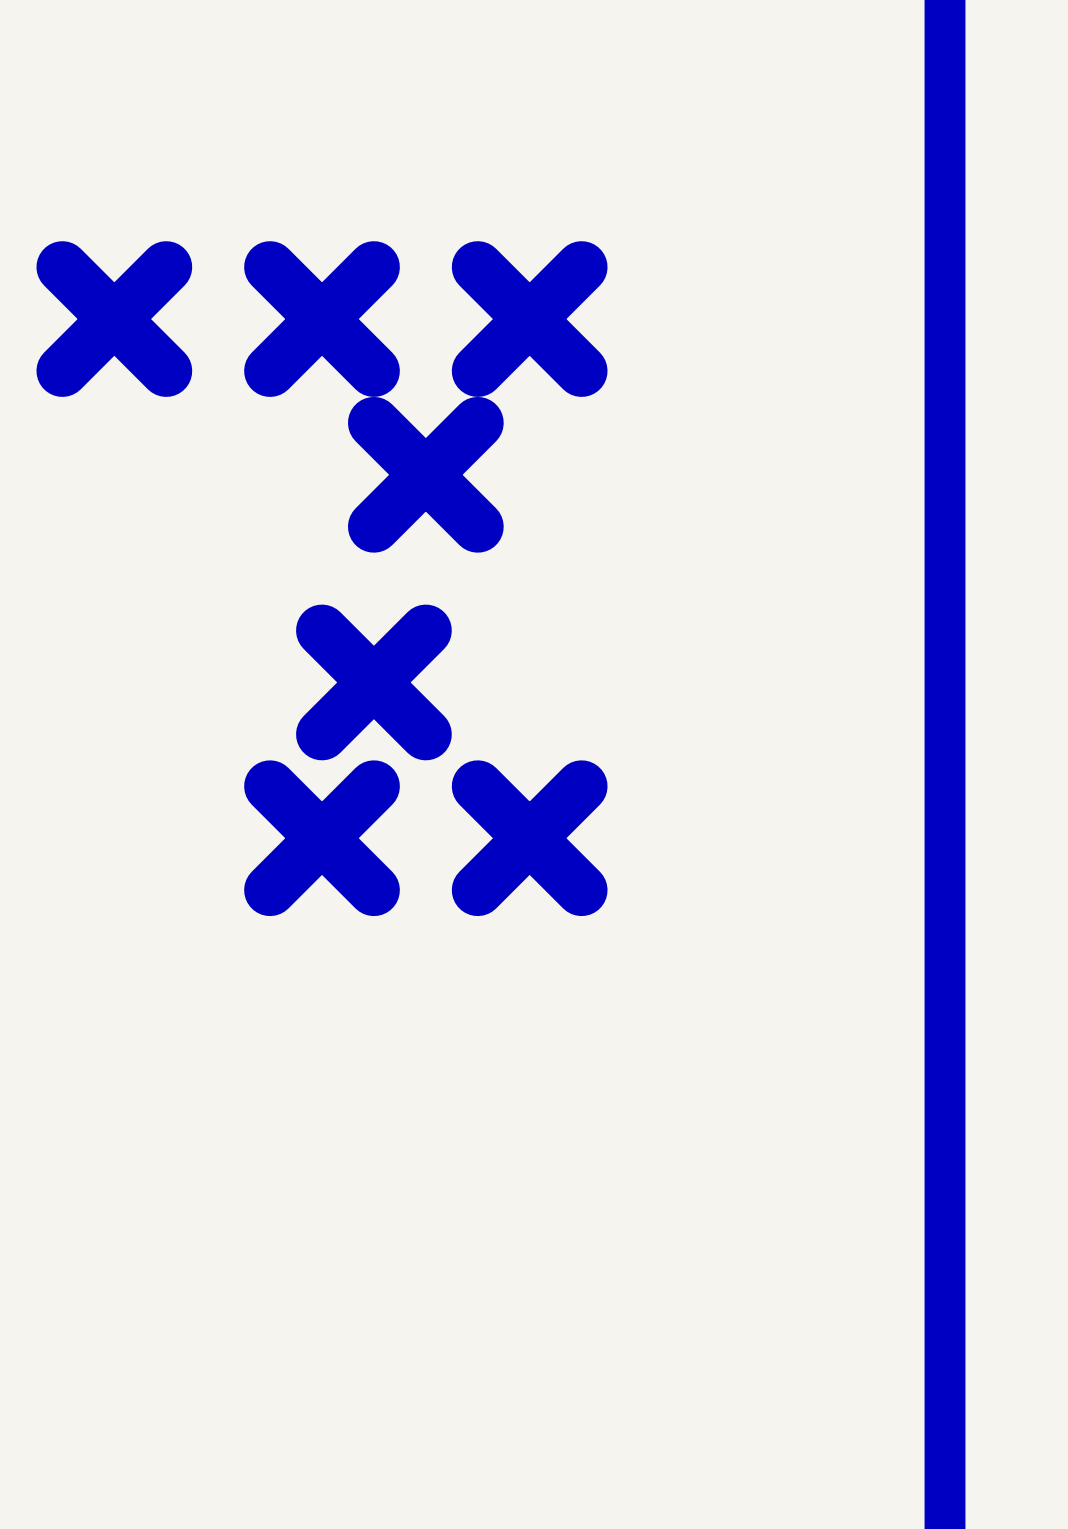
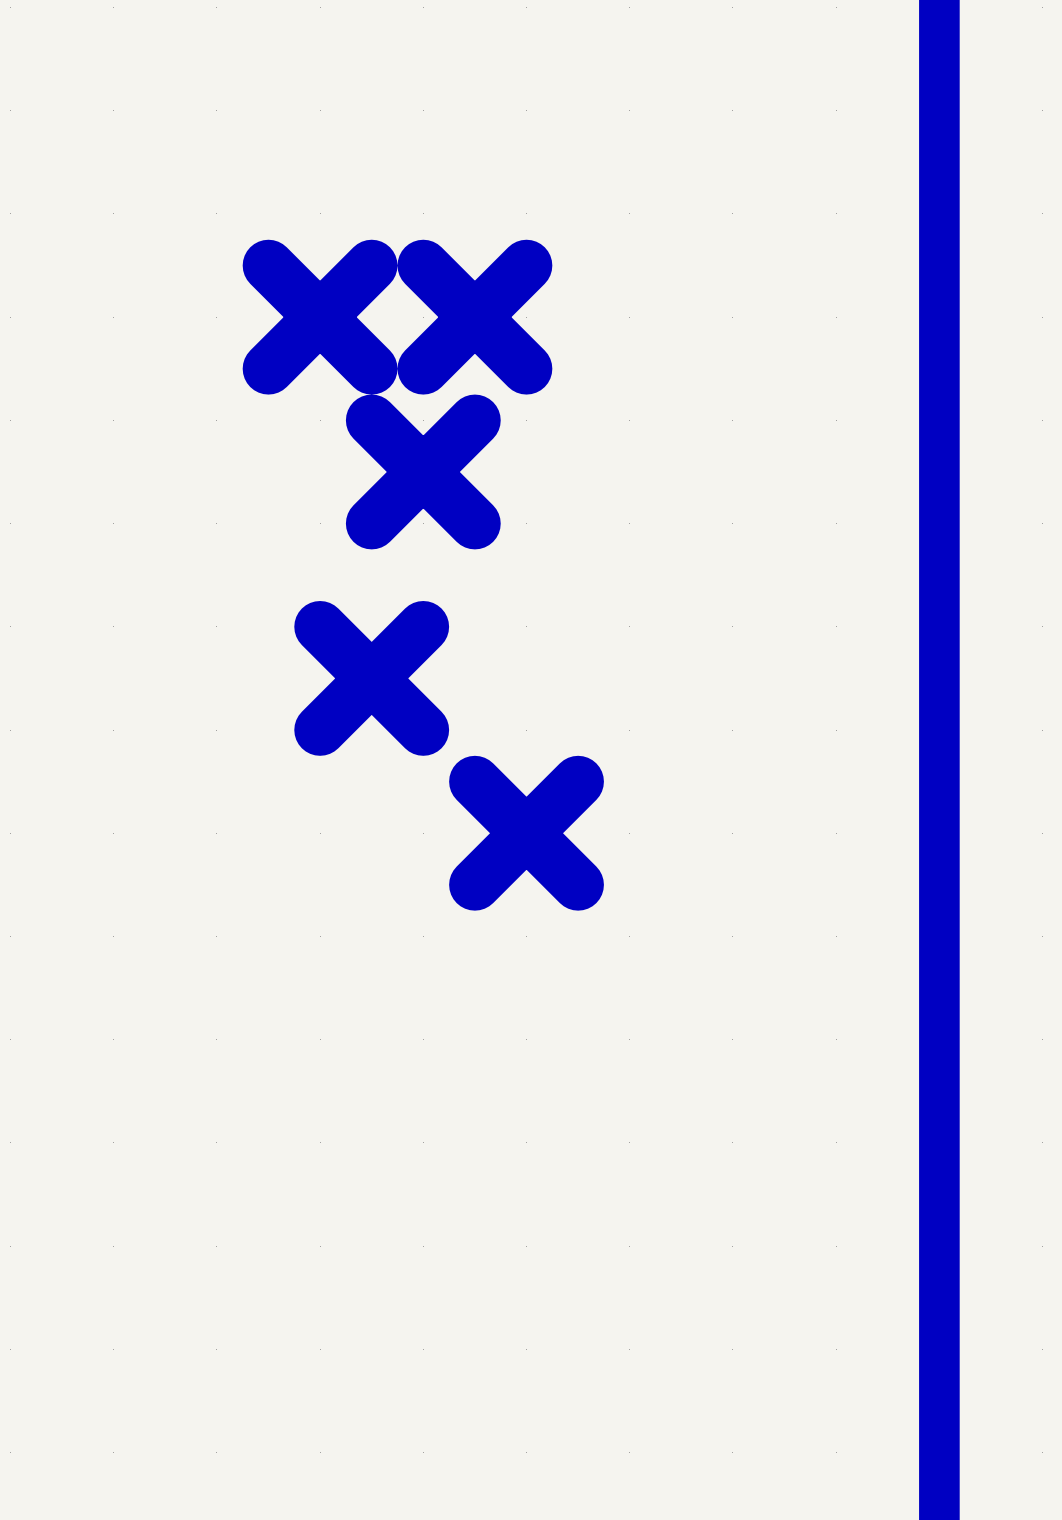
line: (62, 267) (166, 370) -> none
line: (166, 267) (62, 370) -> none
line: (477, 267) (581, 370) -> (423, 265) (526, 368)
line: (581, 267) (477, 370) -> (526, 265) (423, 368)
line: (270, 786) (373, 890) -> none
line: (373, 786) (270, 890) -> none

